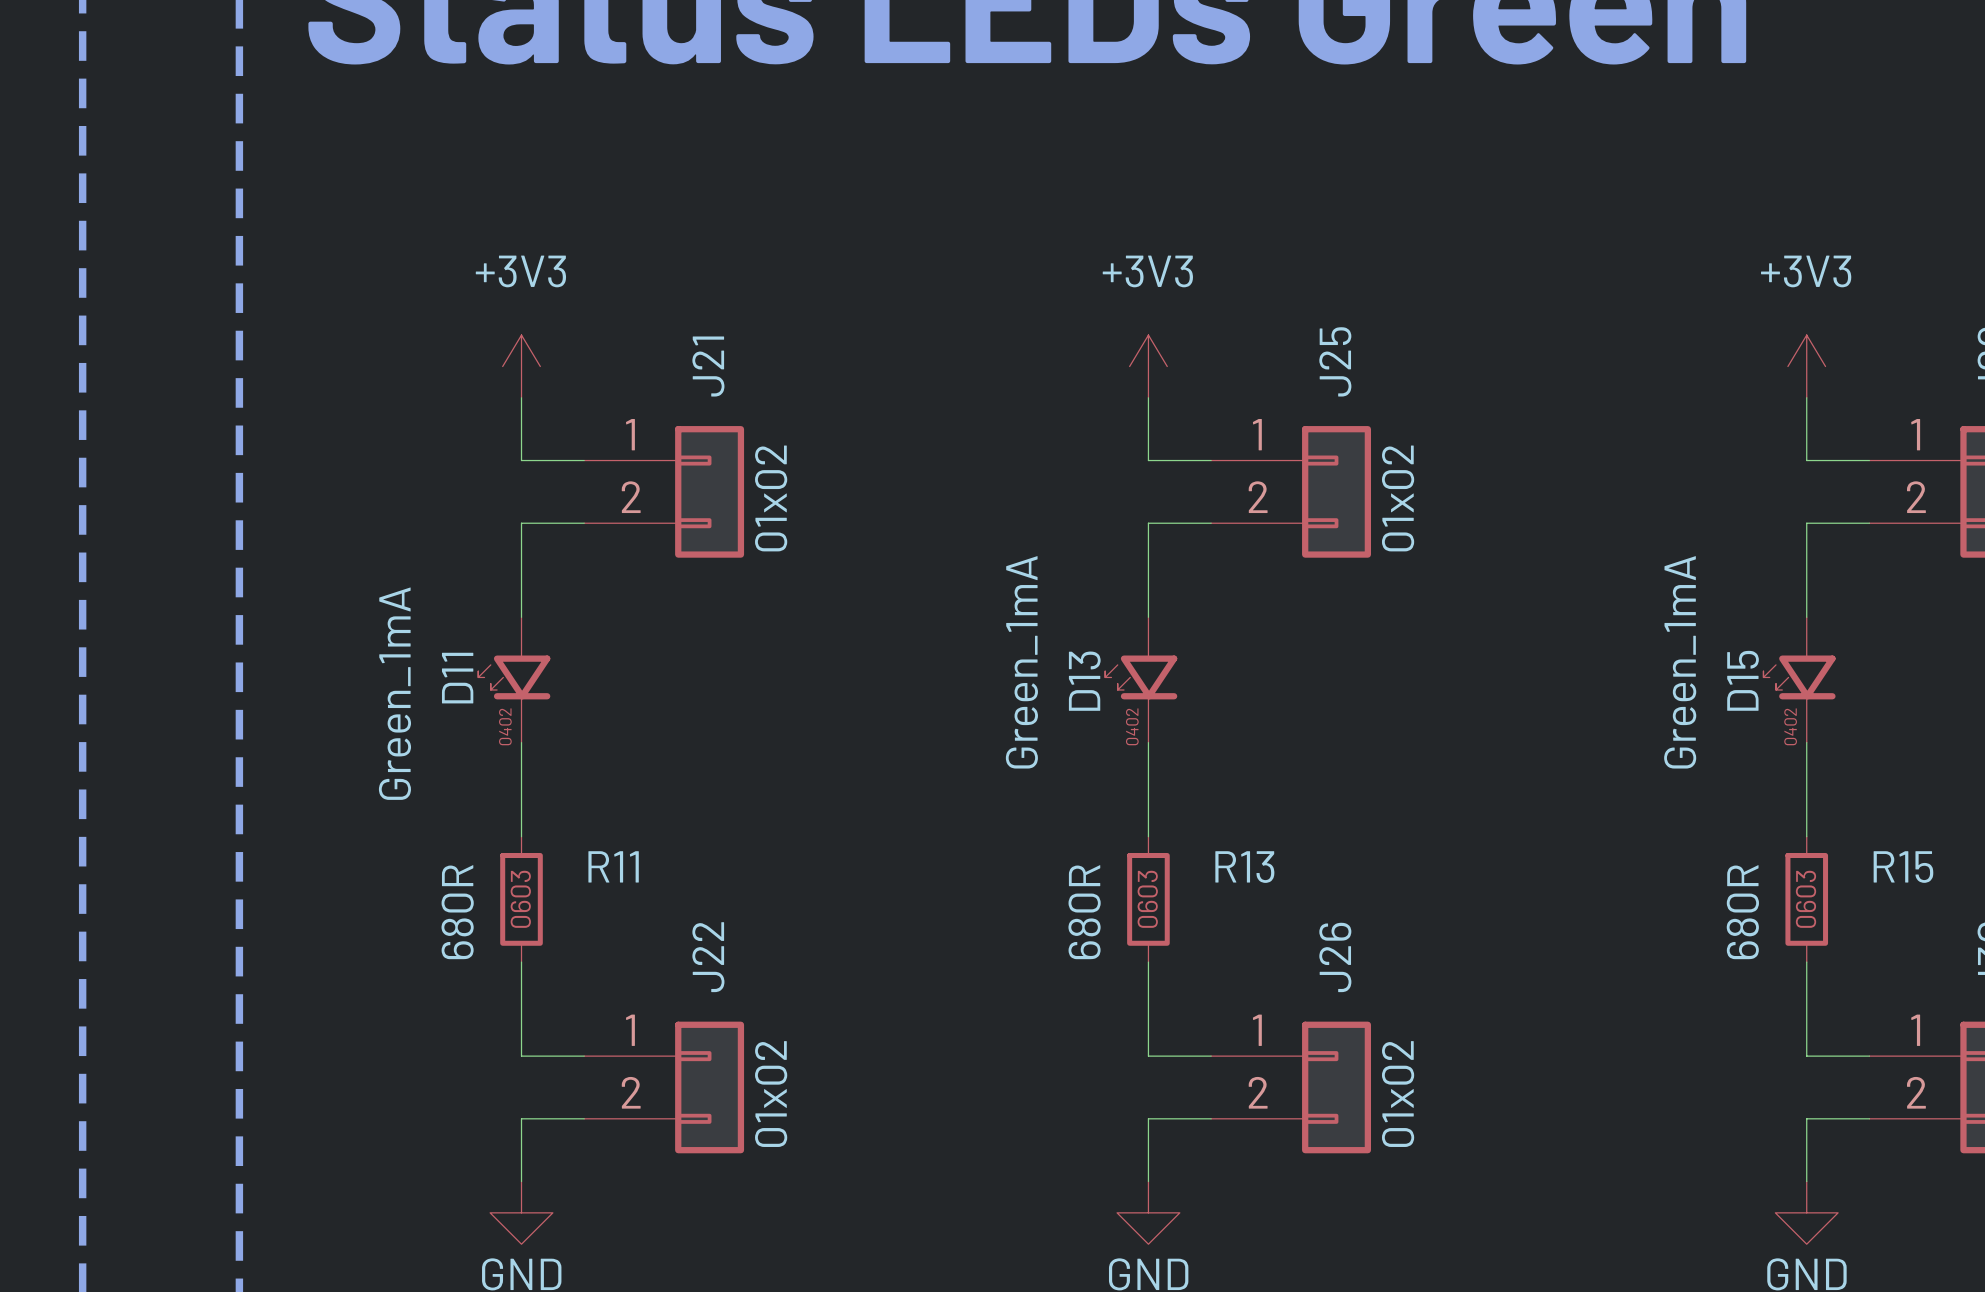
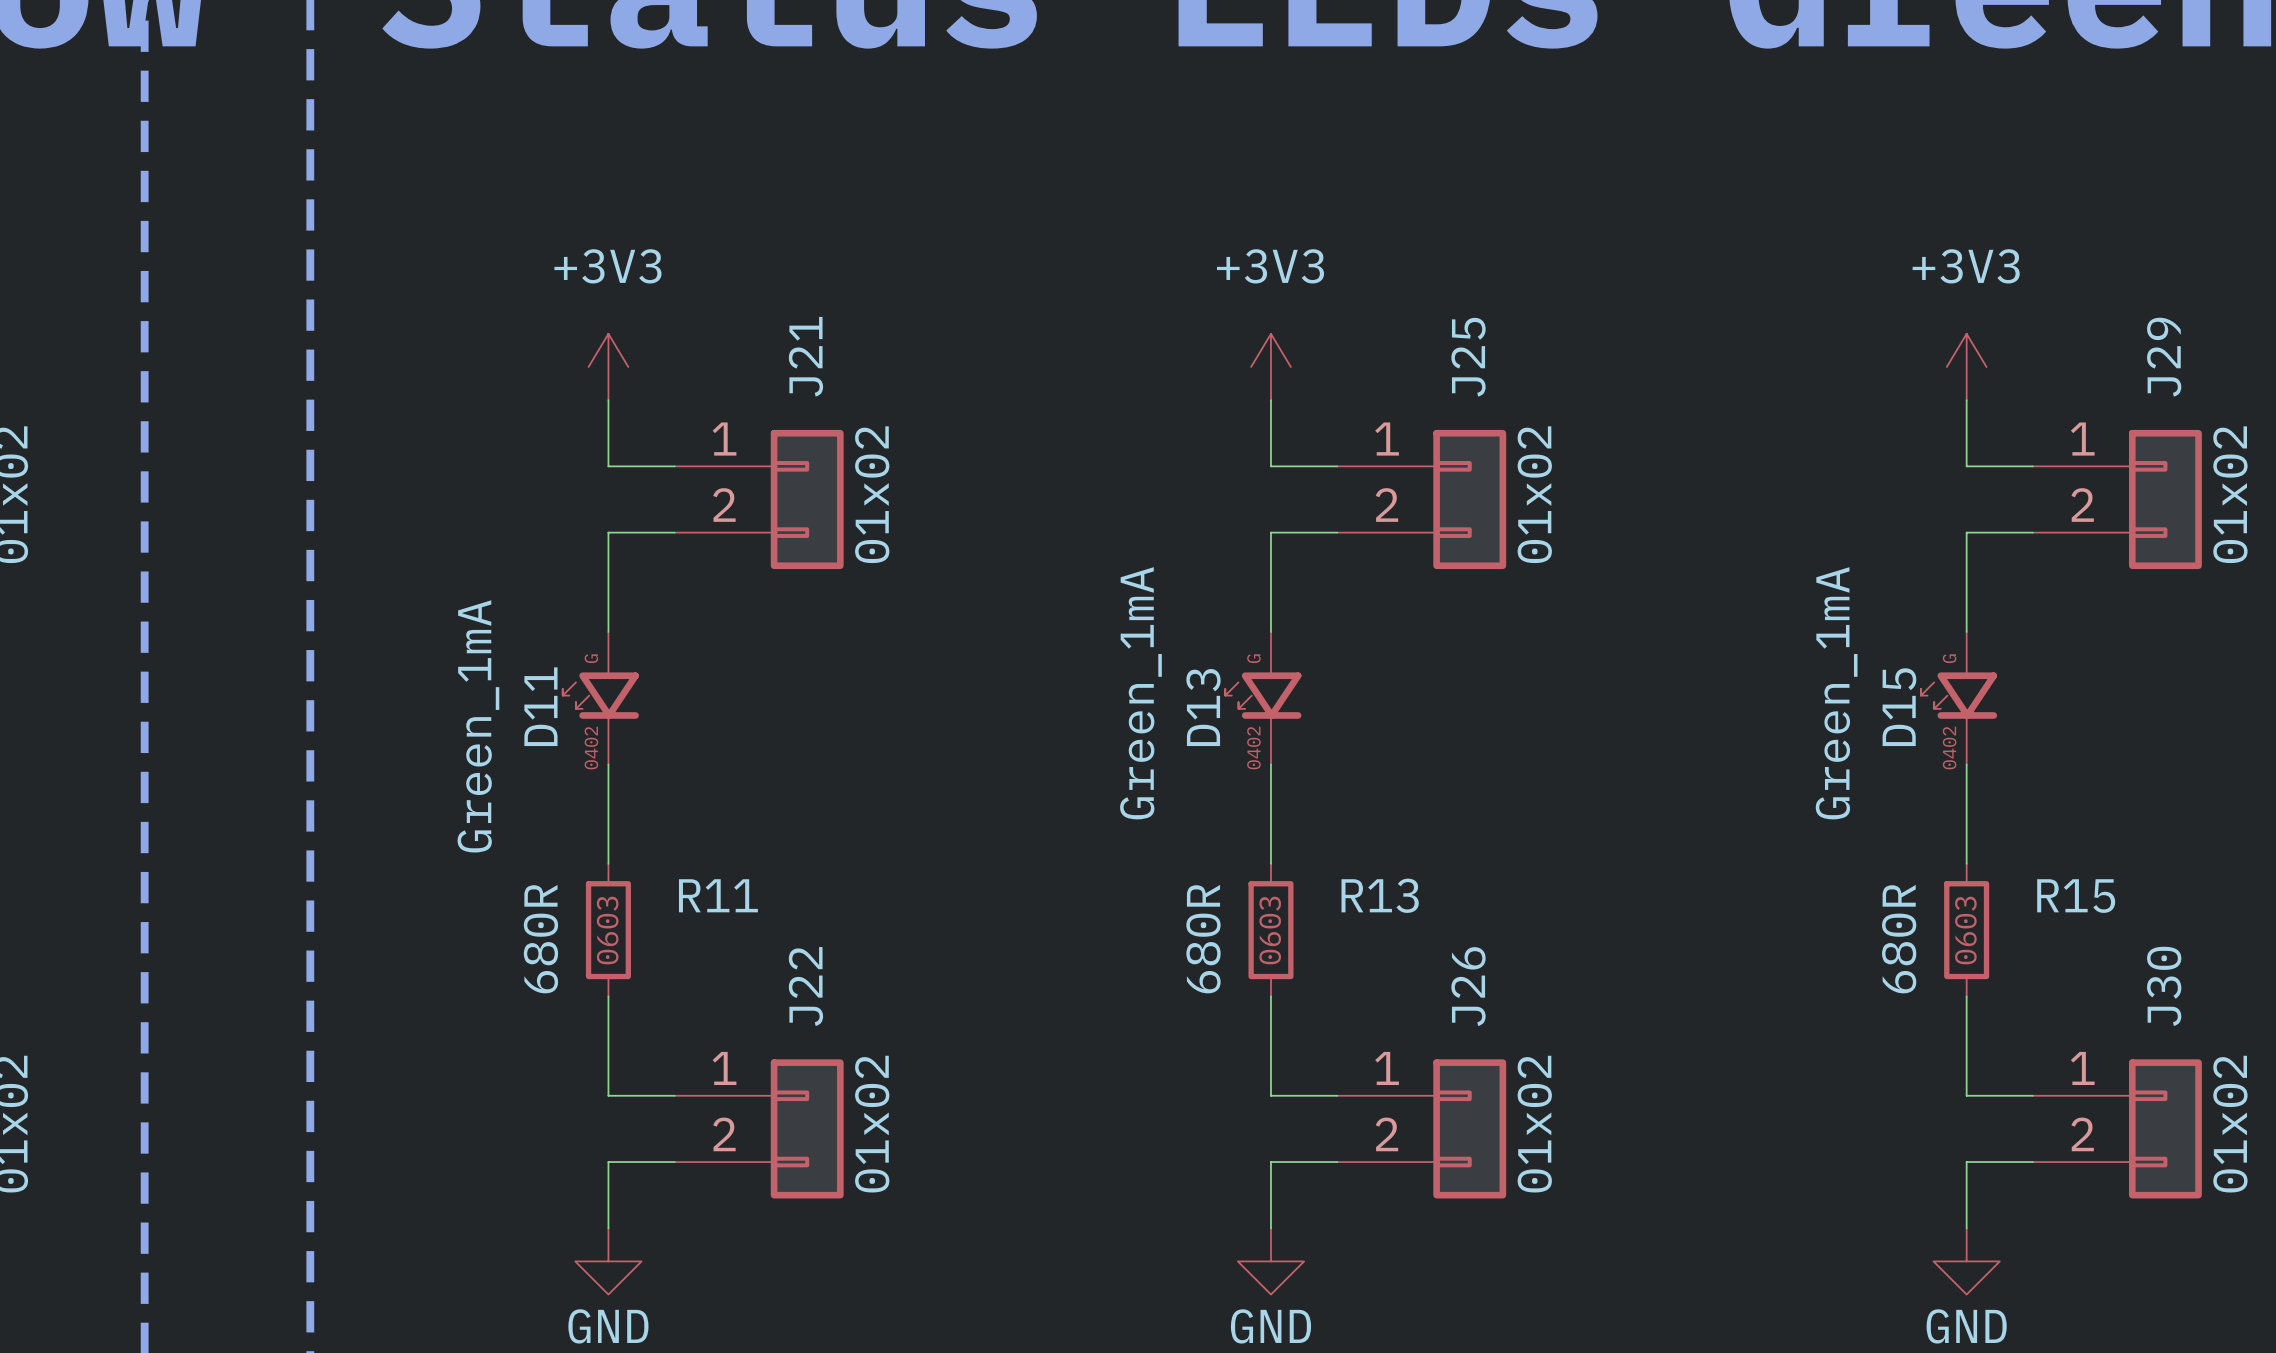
D11 text: none -> G (591, 658)
D13 text: none -> G (1253, 658)
D15 text: none -> G (1949, 658)

